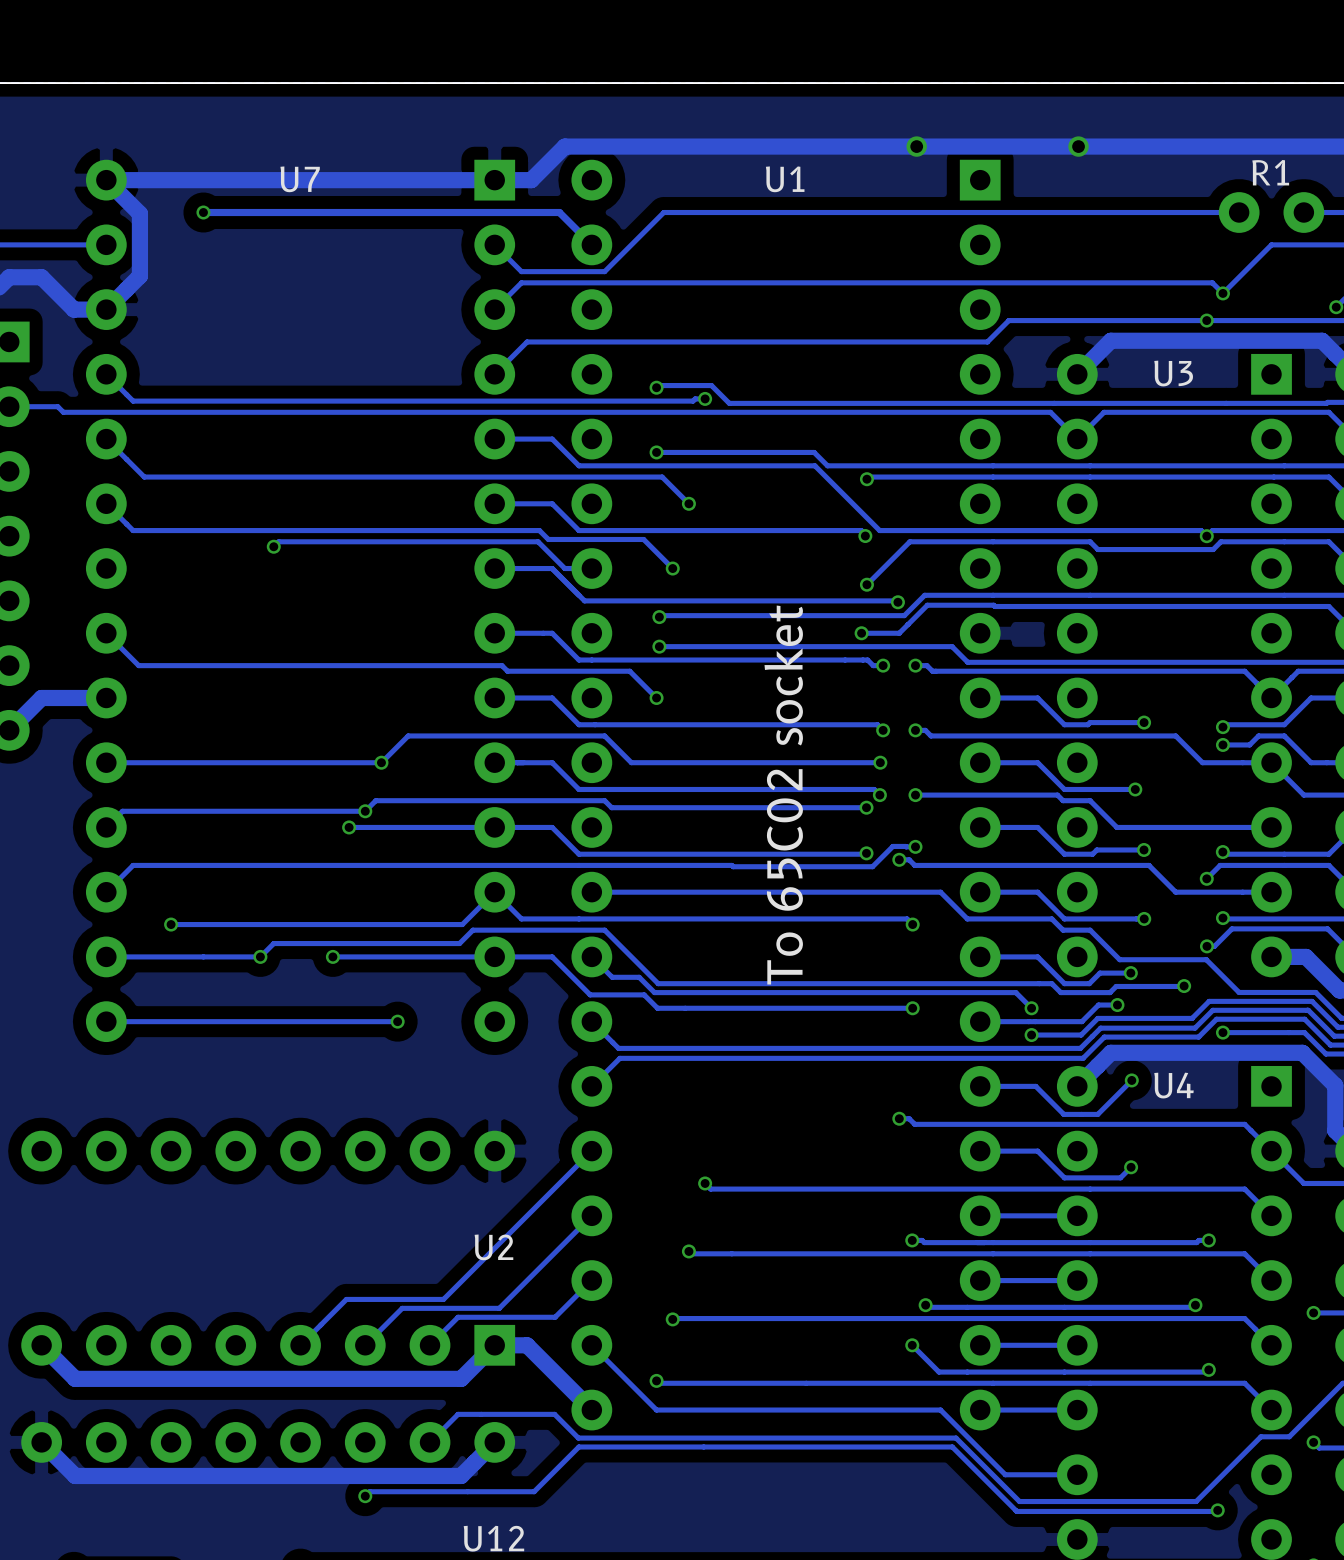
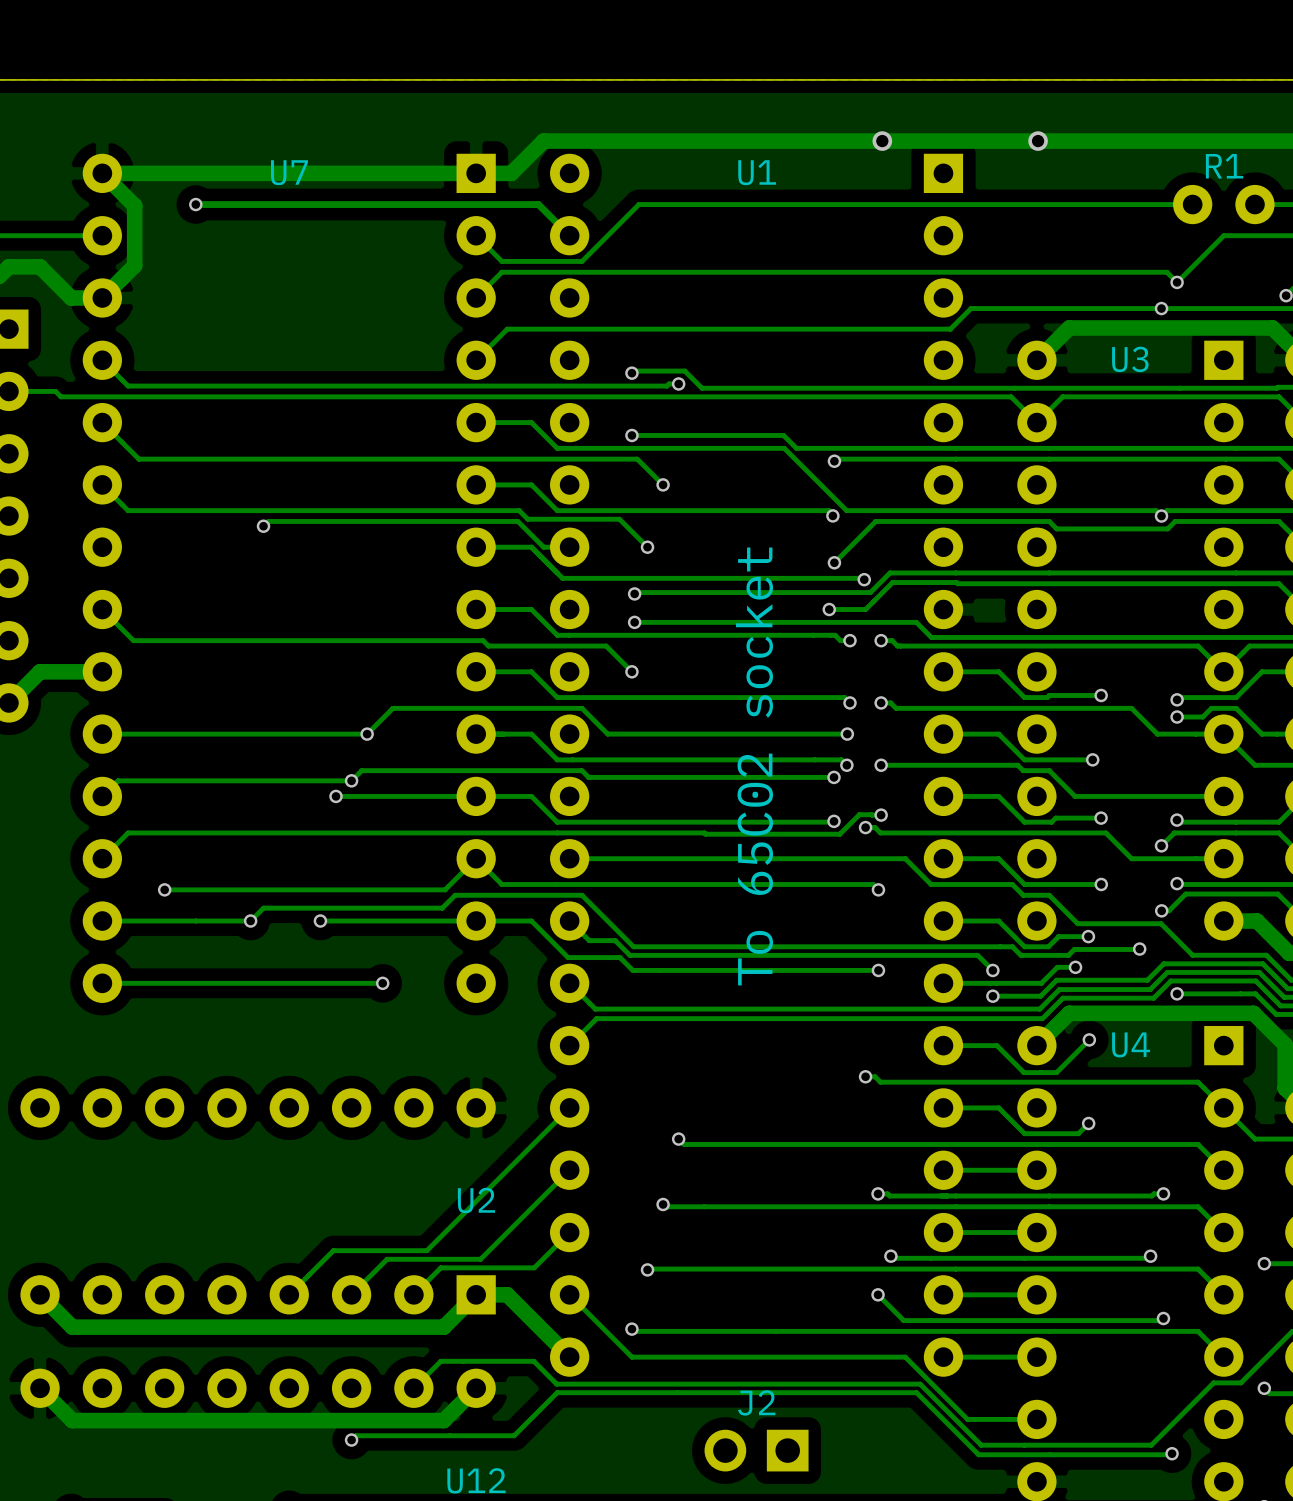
J2: none -> (756, 1450)

